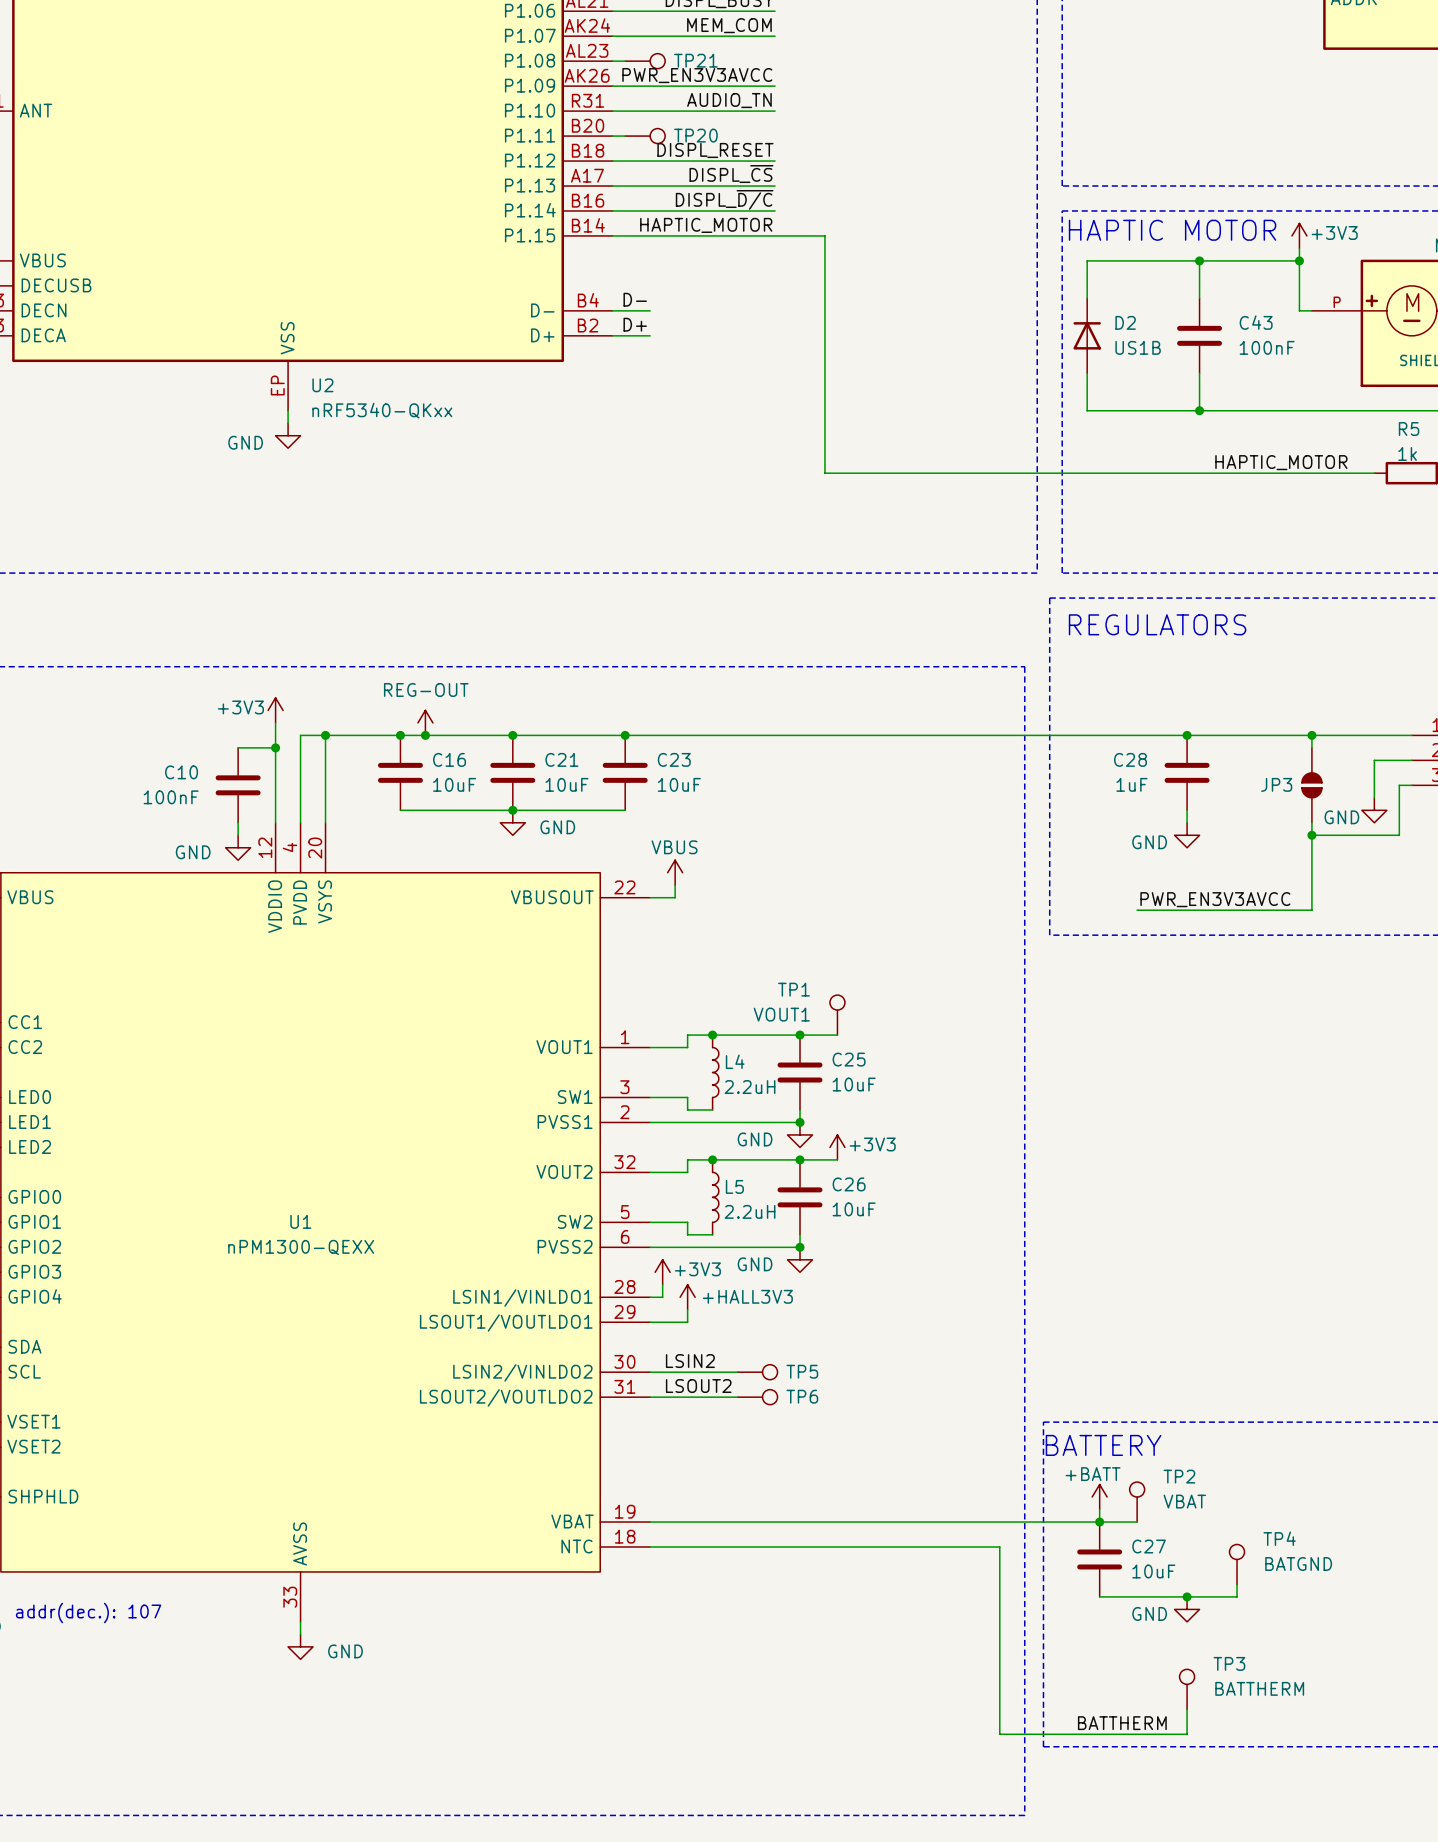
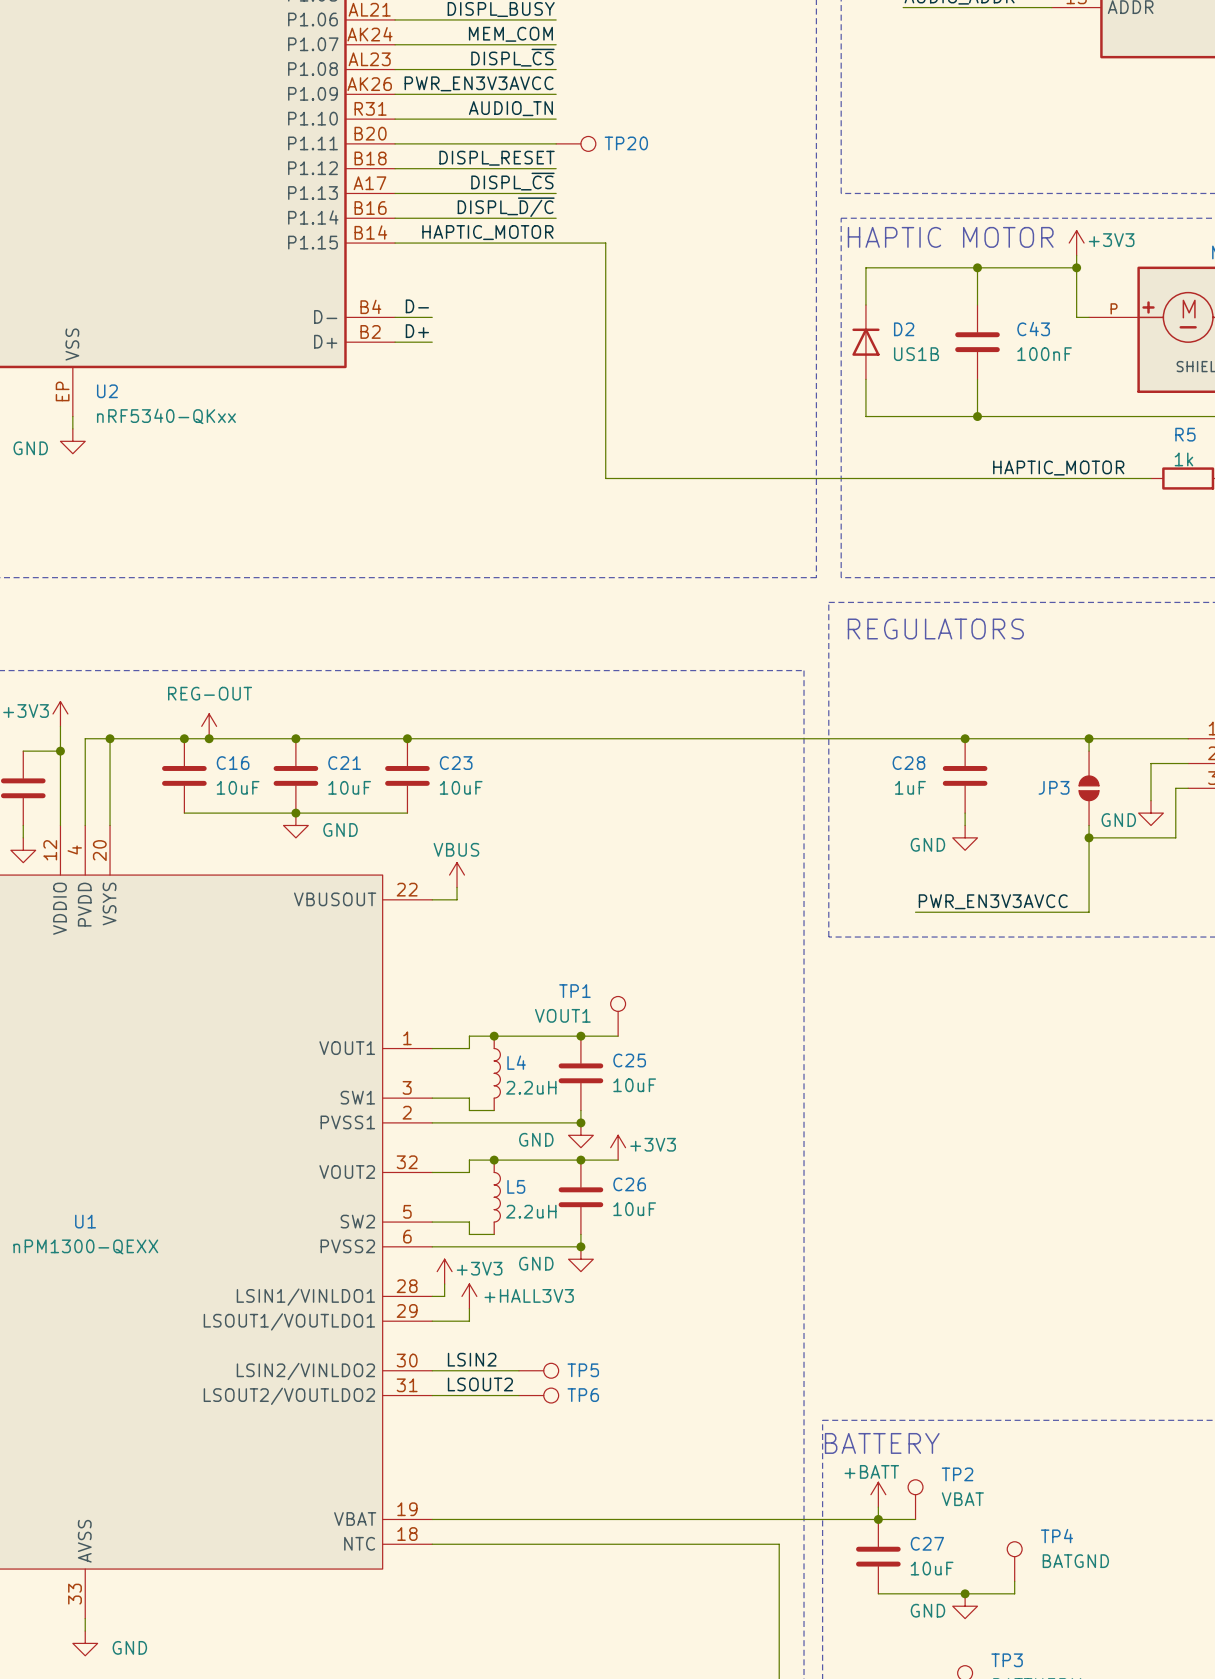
label: none -> DISPL_~{CS} (512, 57)
wire: none -> (407, 69) (556, 69)
TP21: (645, 61) -> none
wire: none -> (407, 143) (556, 143)
TP20 position: (645, 136) -> (575, 143)

